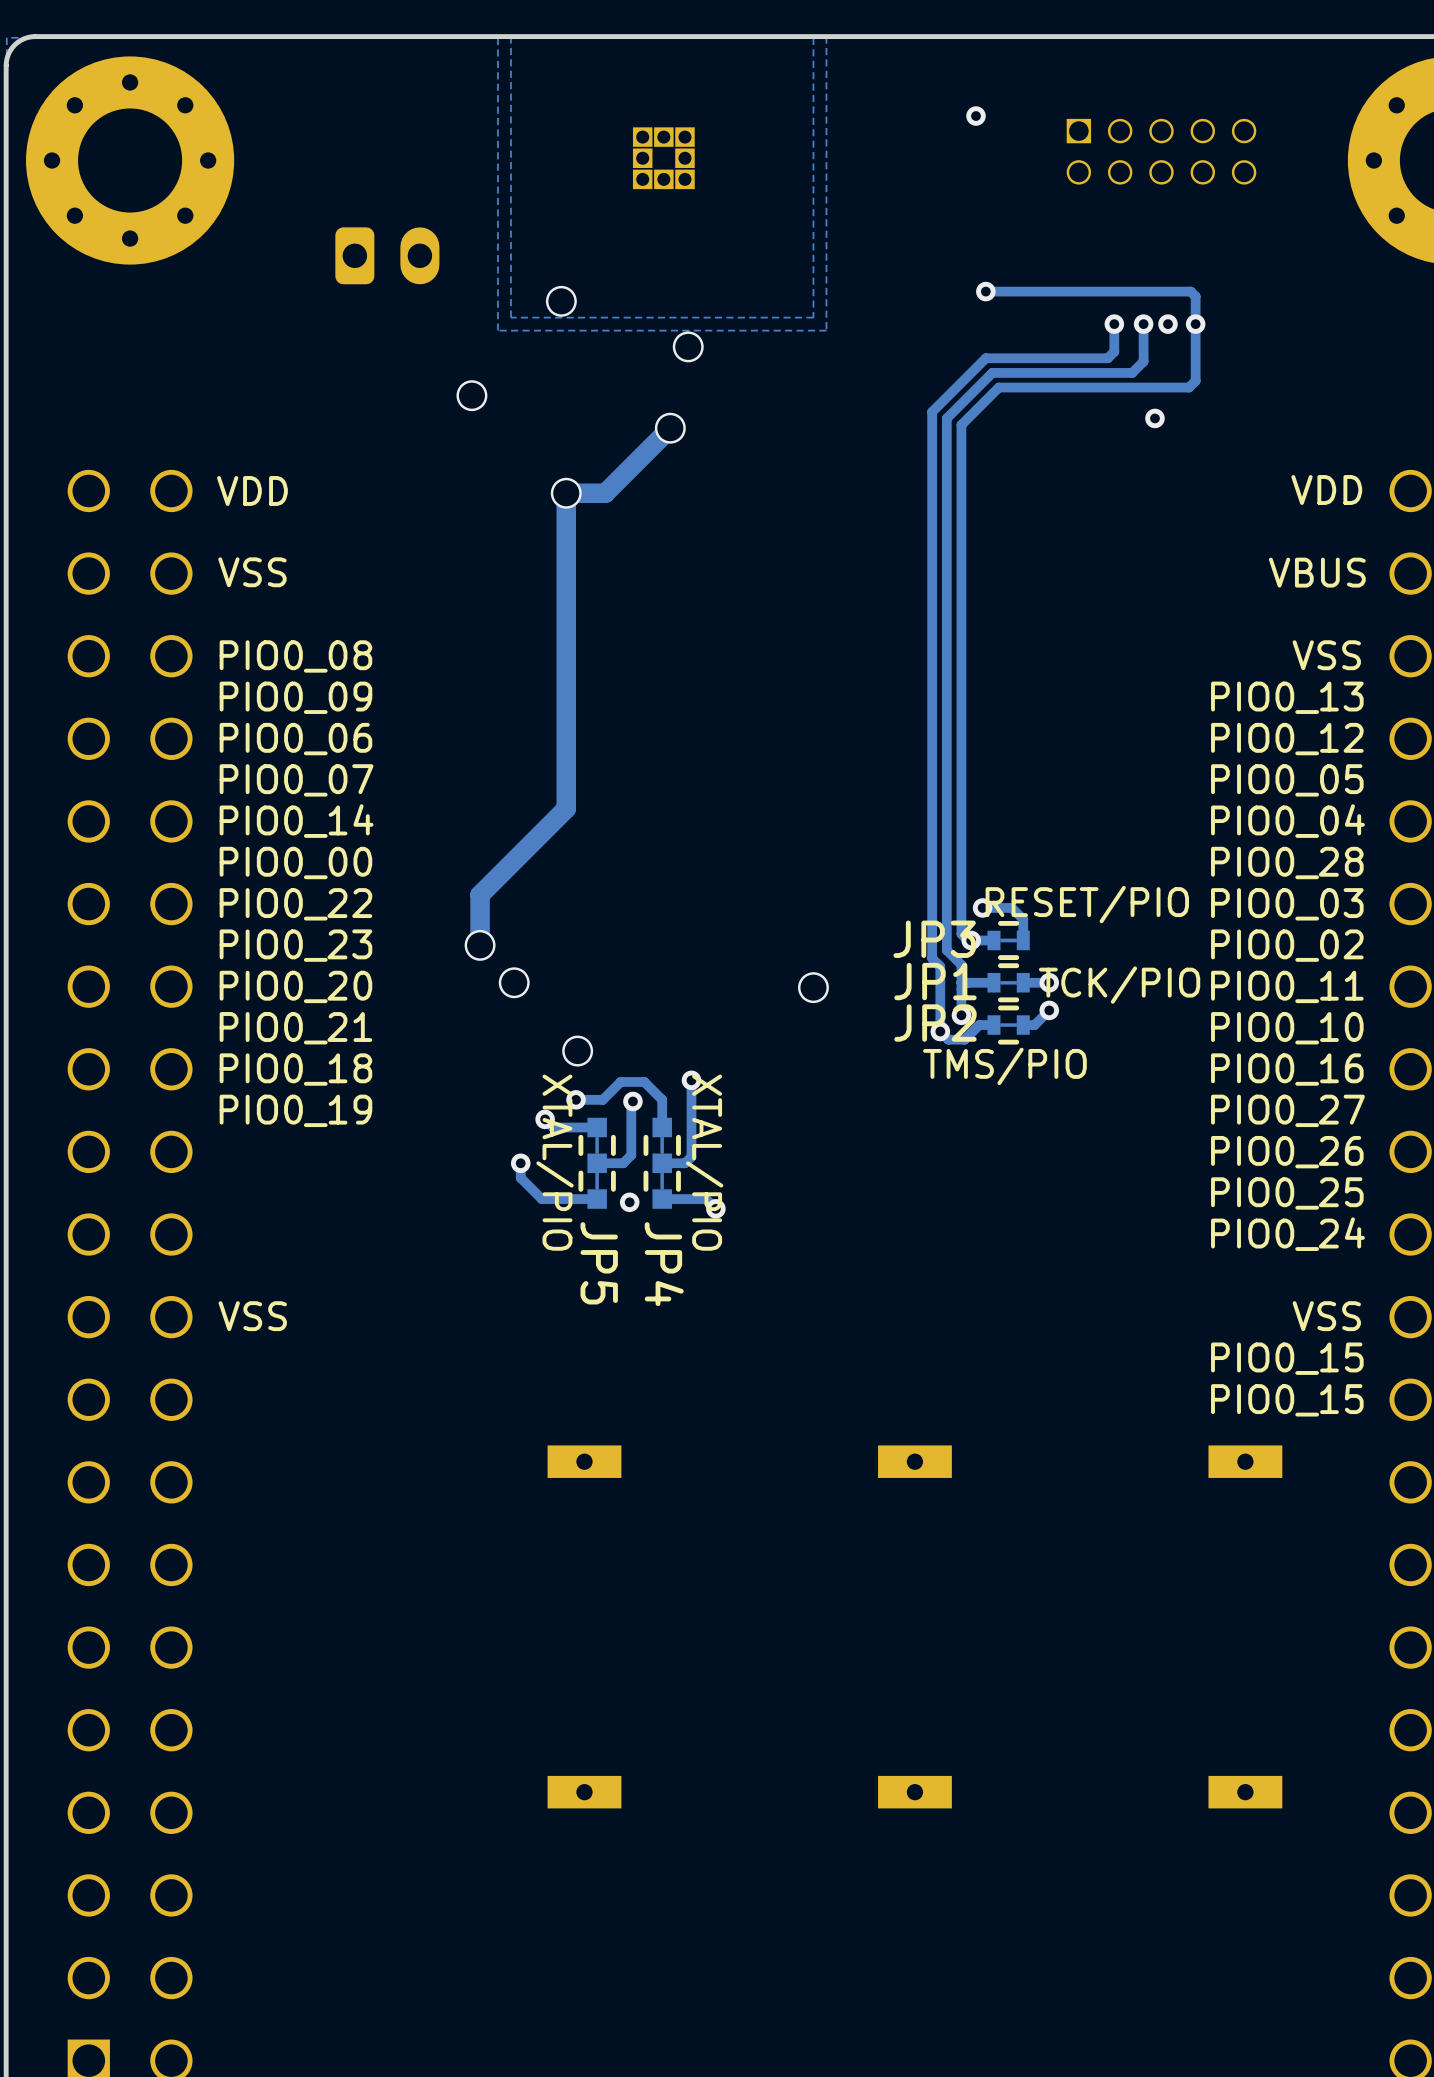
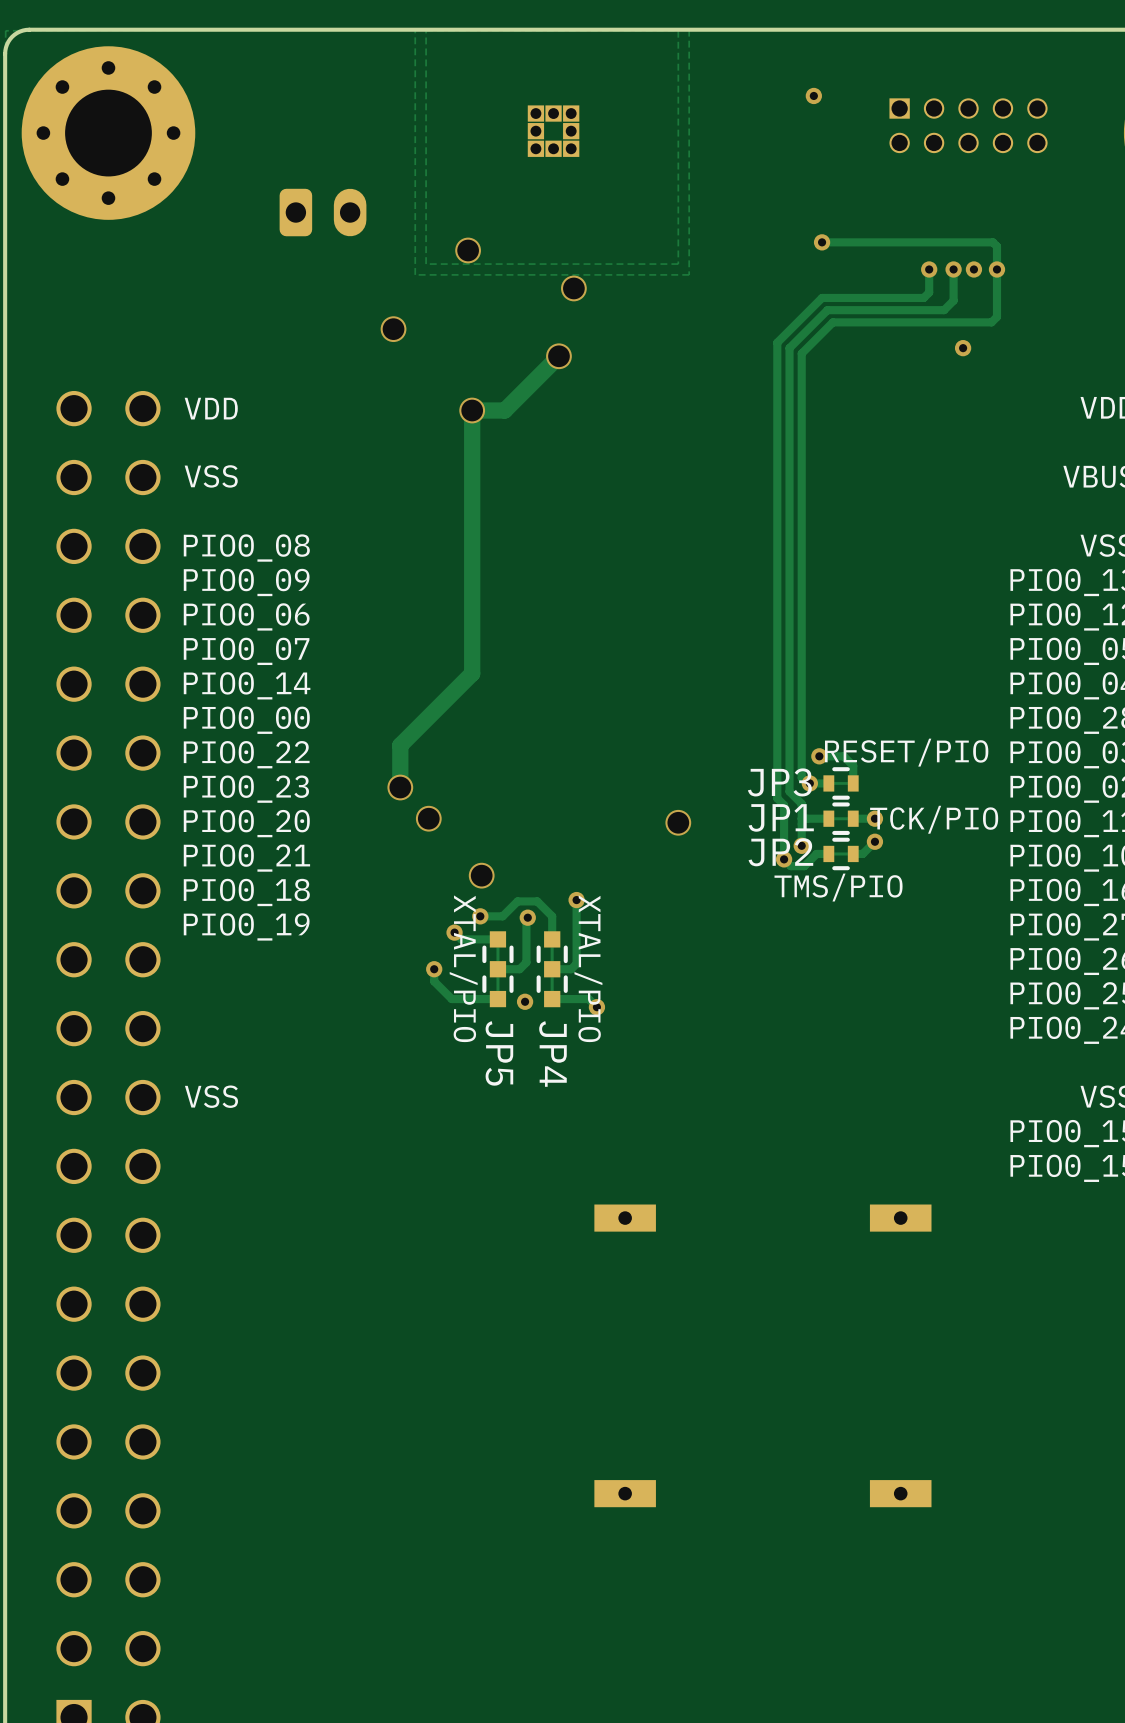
part: (584, 1461) -> none
part: none -> (625, 1218)
part: (914, 1461) -> none
part: none -> (900, 1218)
part: (1245, 1461) -> none
part: (584, 1792) -> none
part: none -> (625, 1493)
part: (914, 1792) -> none
part: none -> (900, 1493)
part: (1245, 1792) -> none

